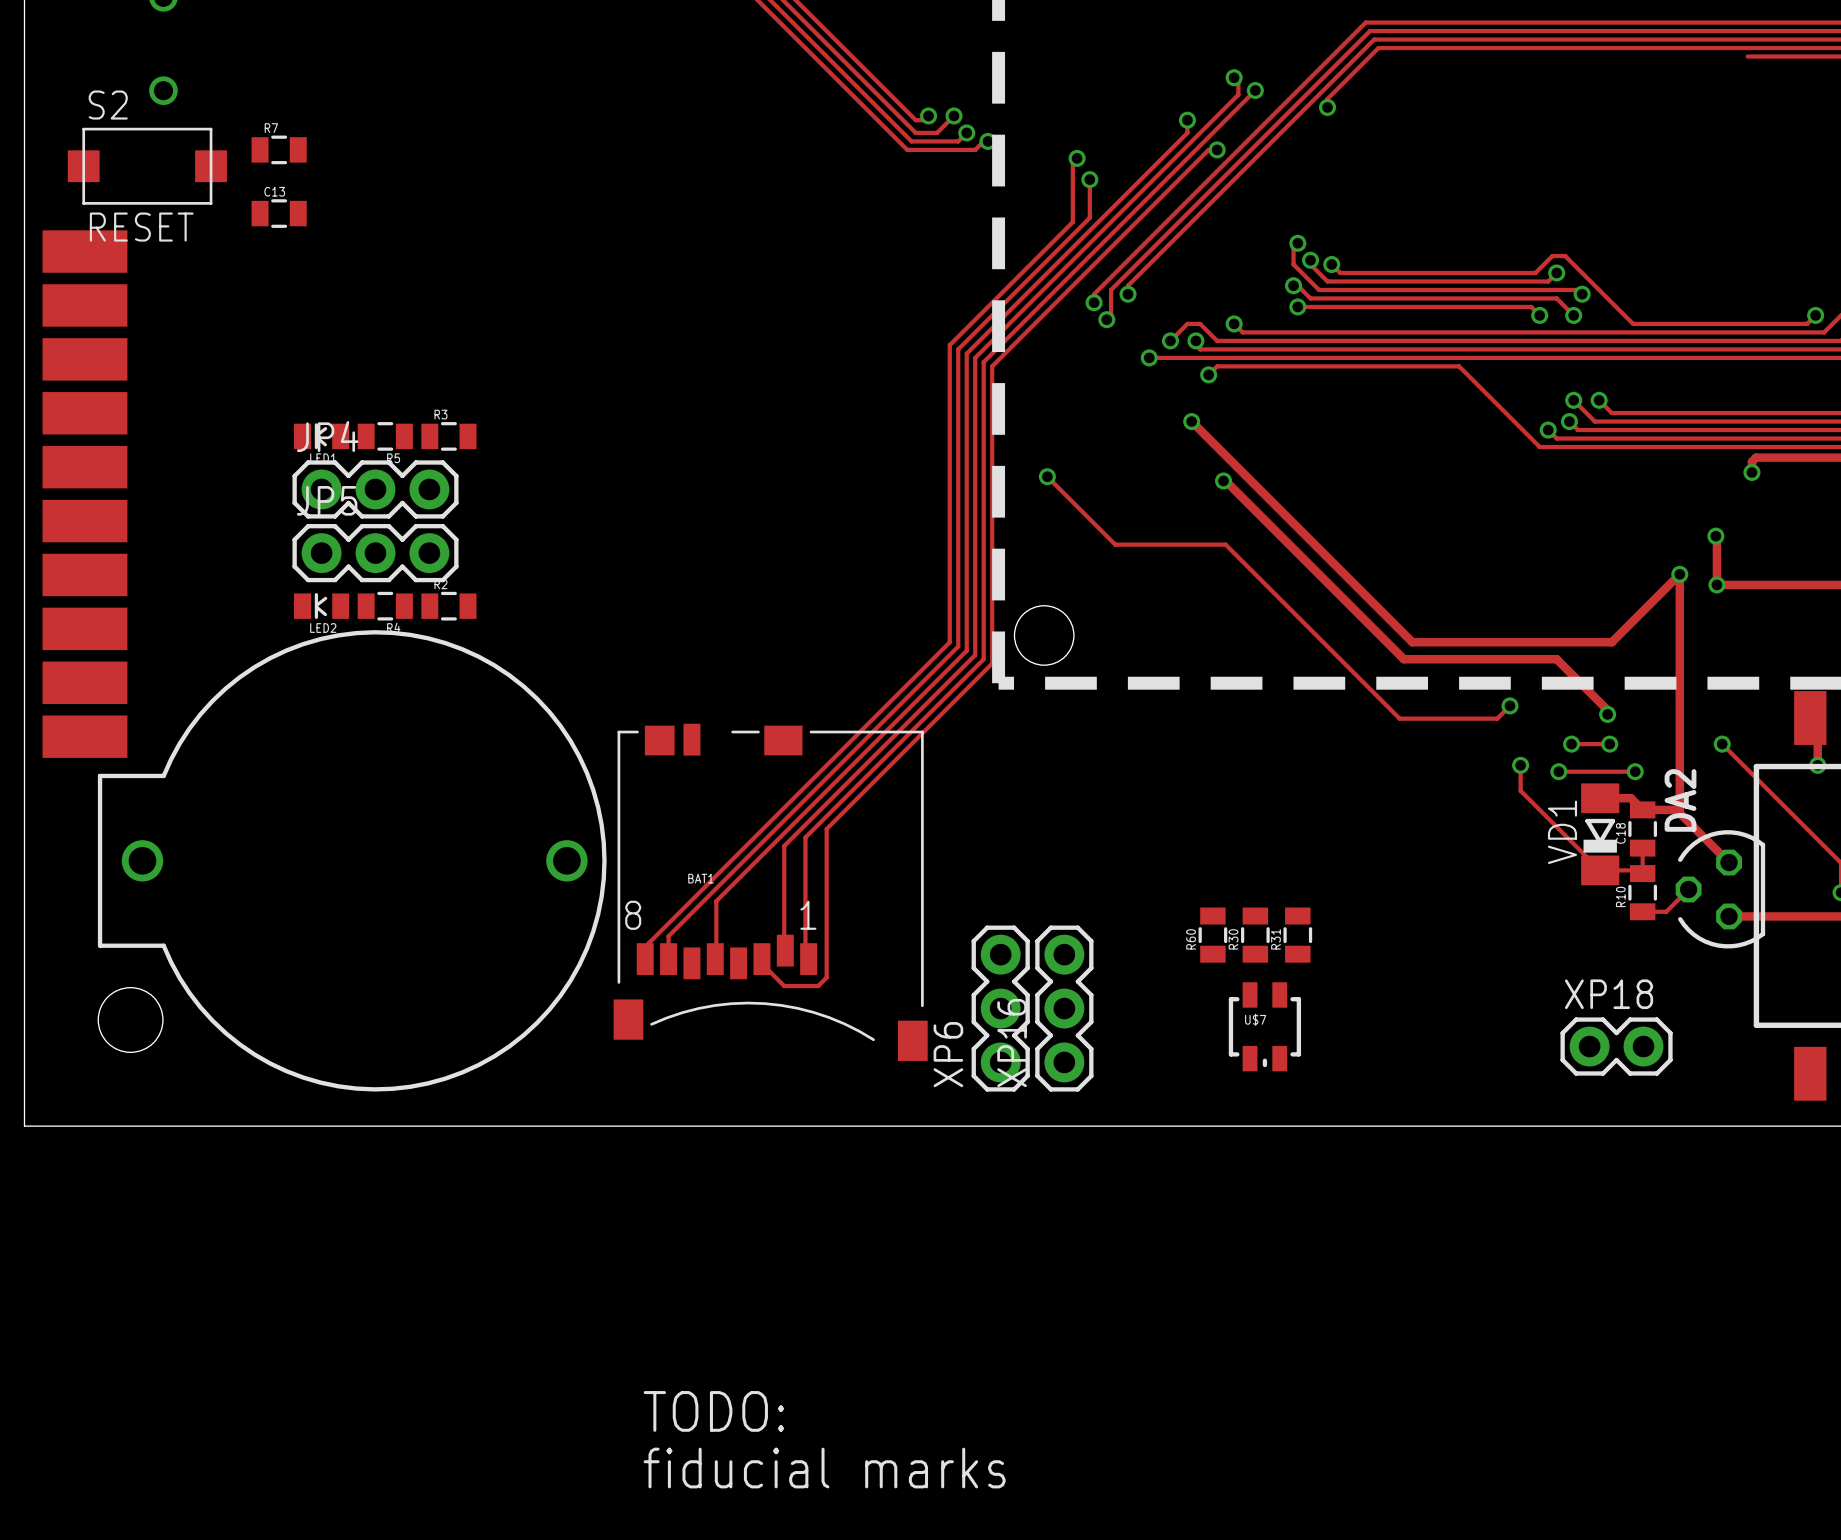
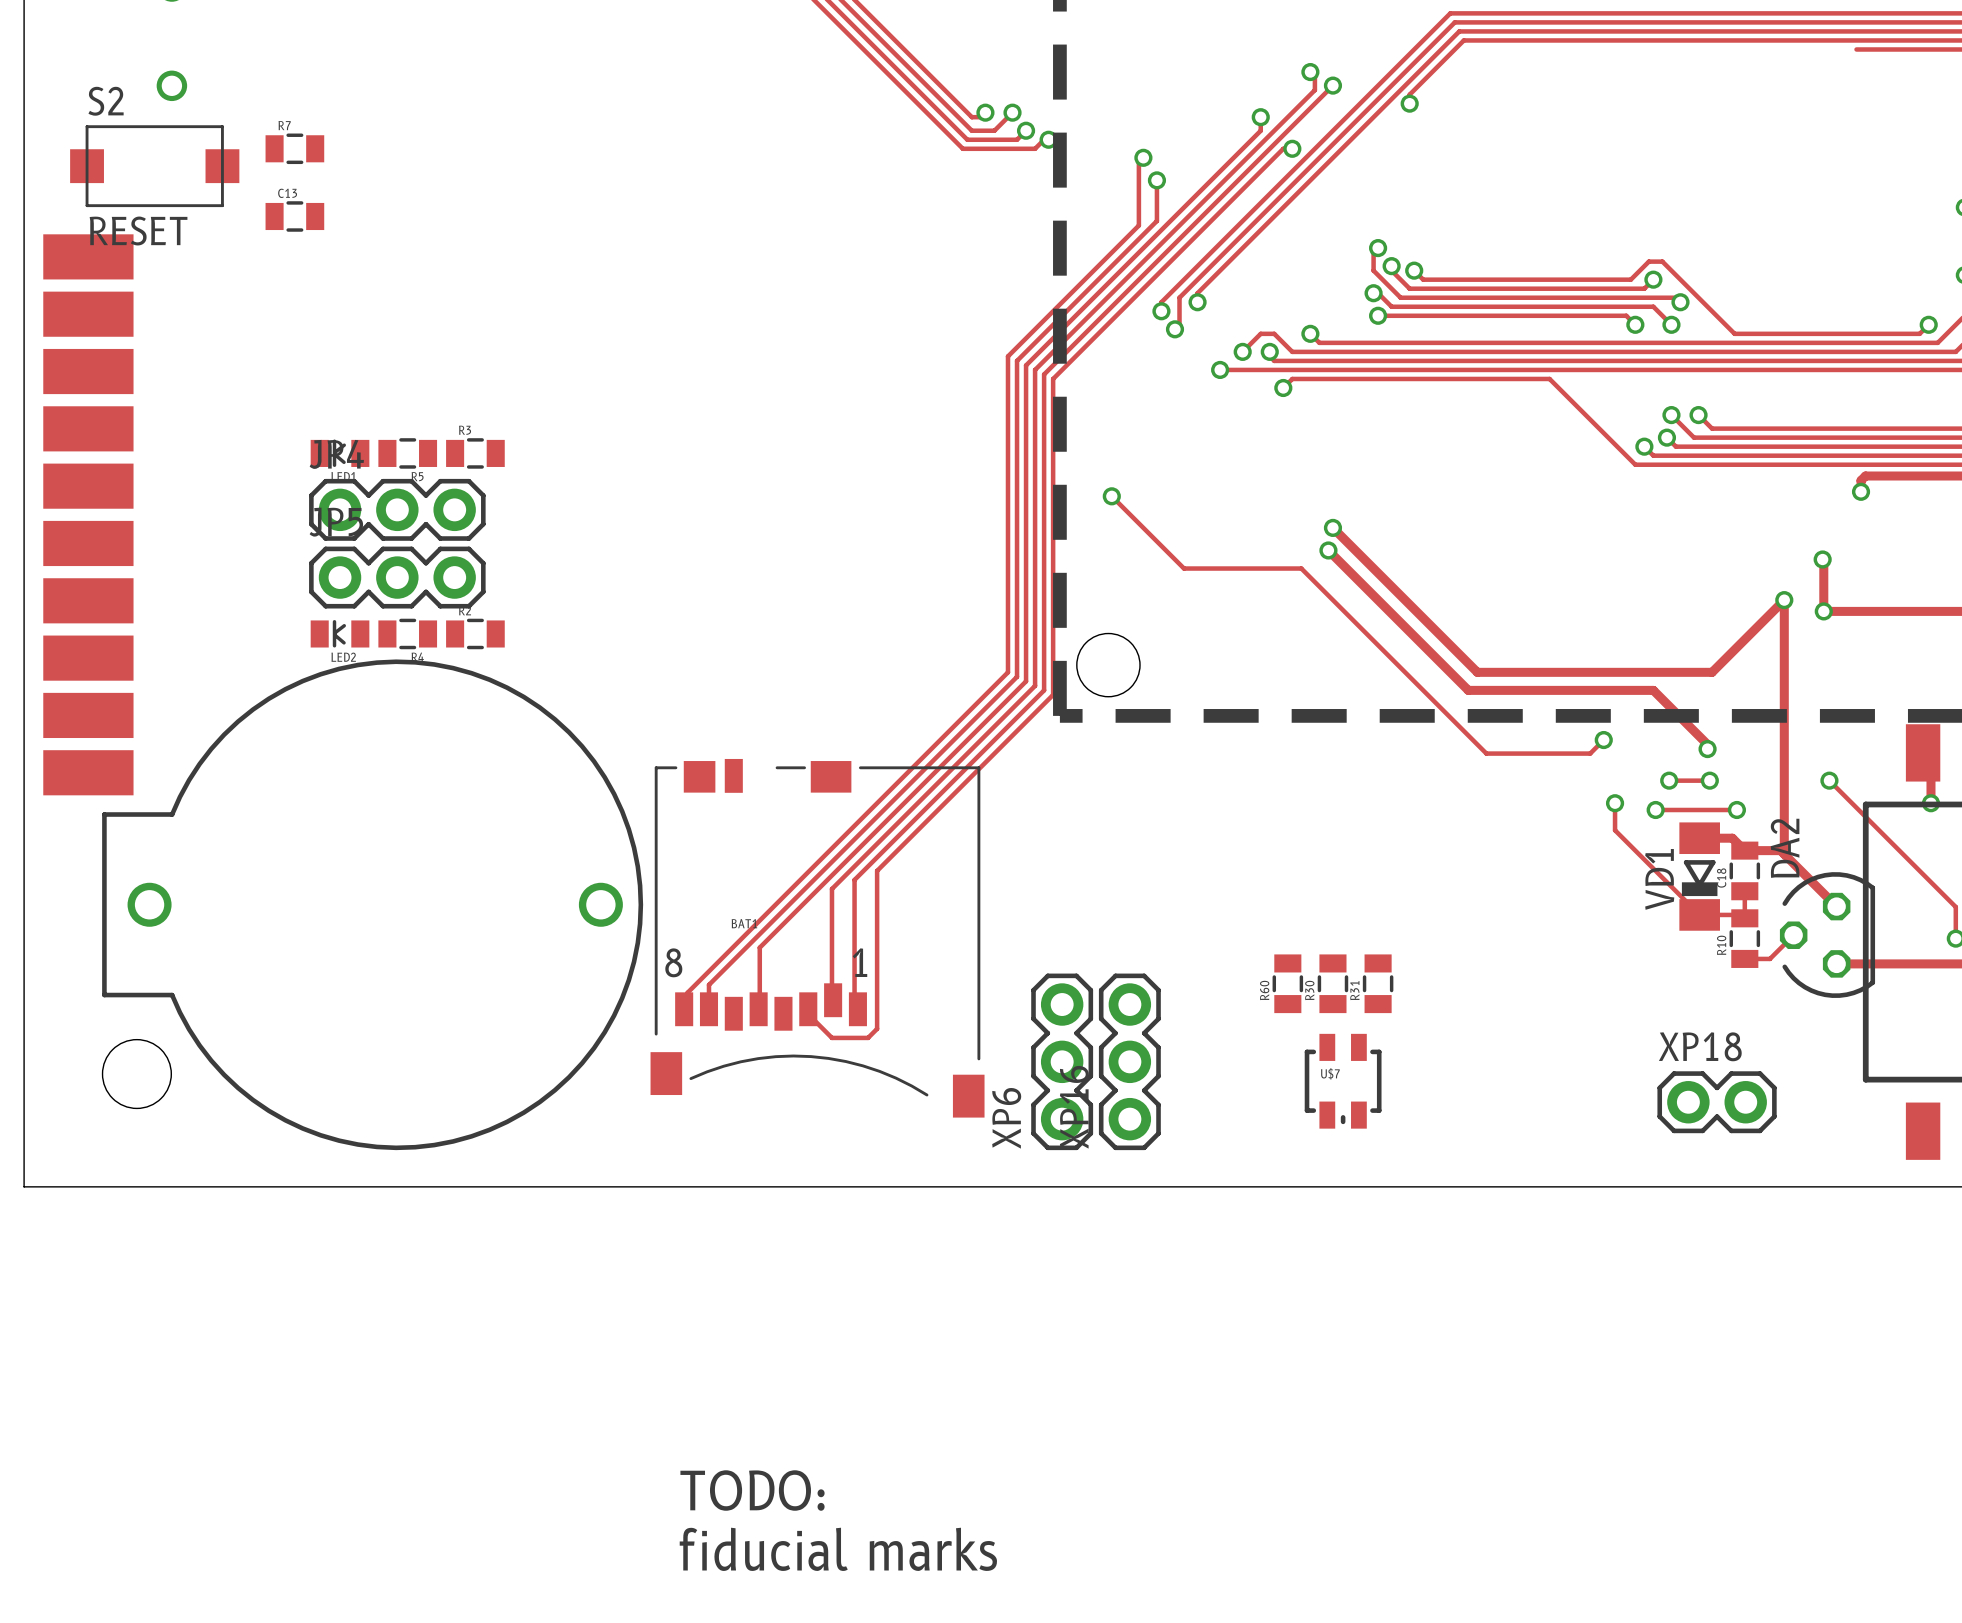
track: (1191, 421) (1412, 642) -> (1332, 527) (1477, 672) (1499, 672)
via: (1191, 421) -> none
track: (1223, 480) (1403, 659) -> (1328, 550) (1468, 690) (1490, 690)
via: (1223, 480) -> none
via: none -> (1332, 527)
via: none -> (1328, 550)

